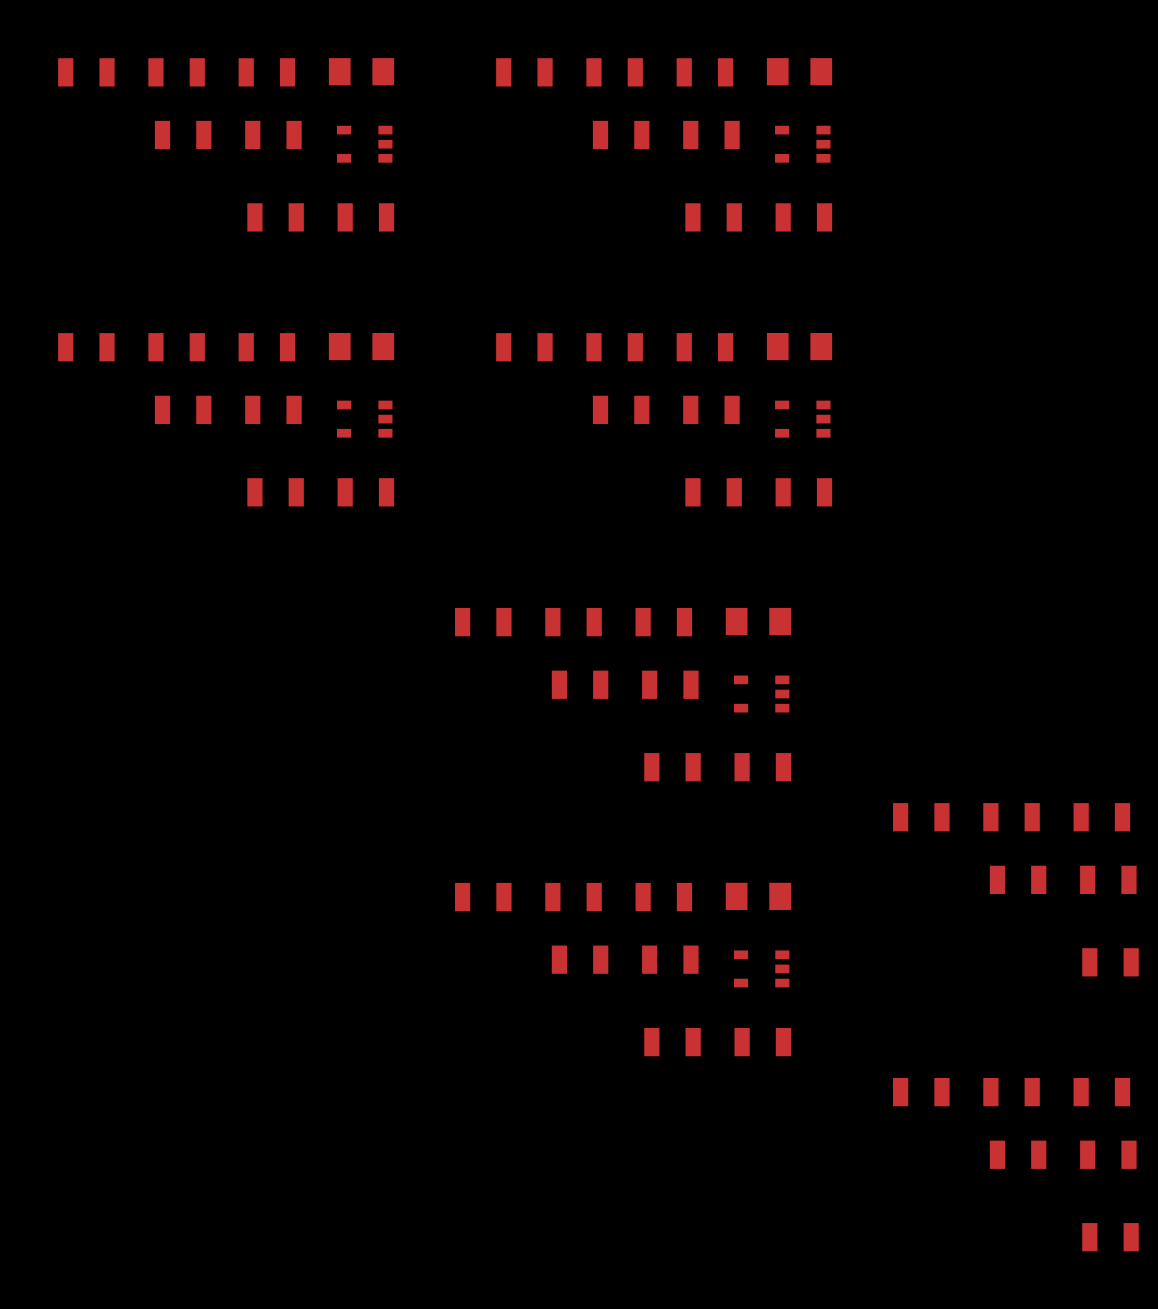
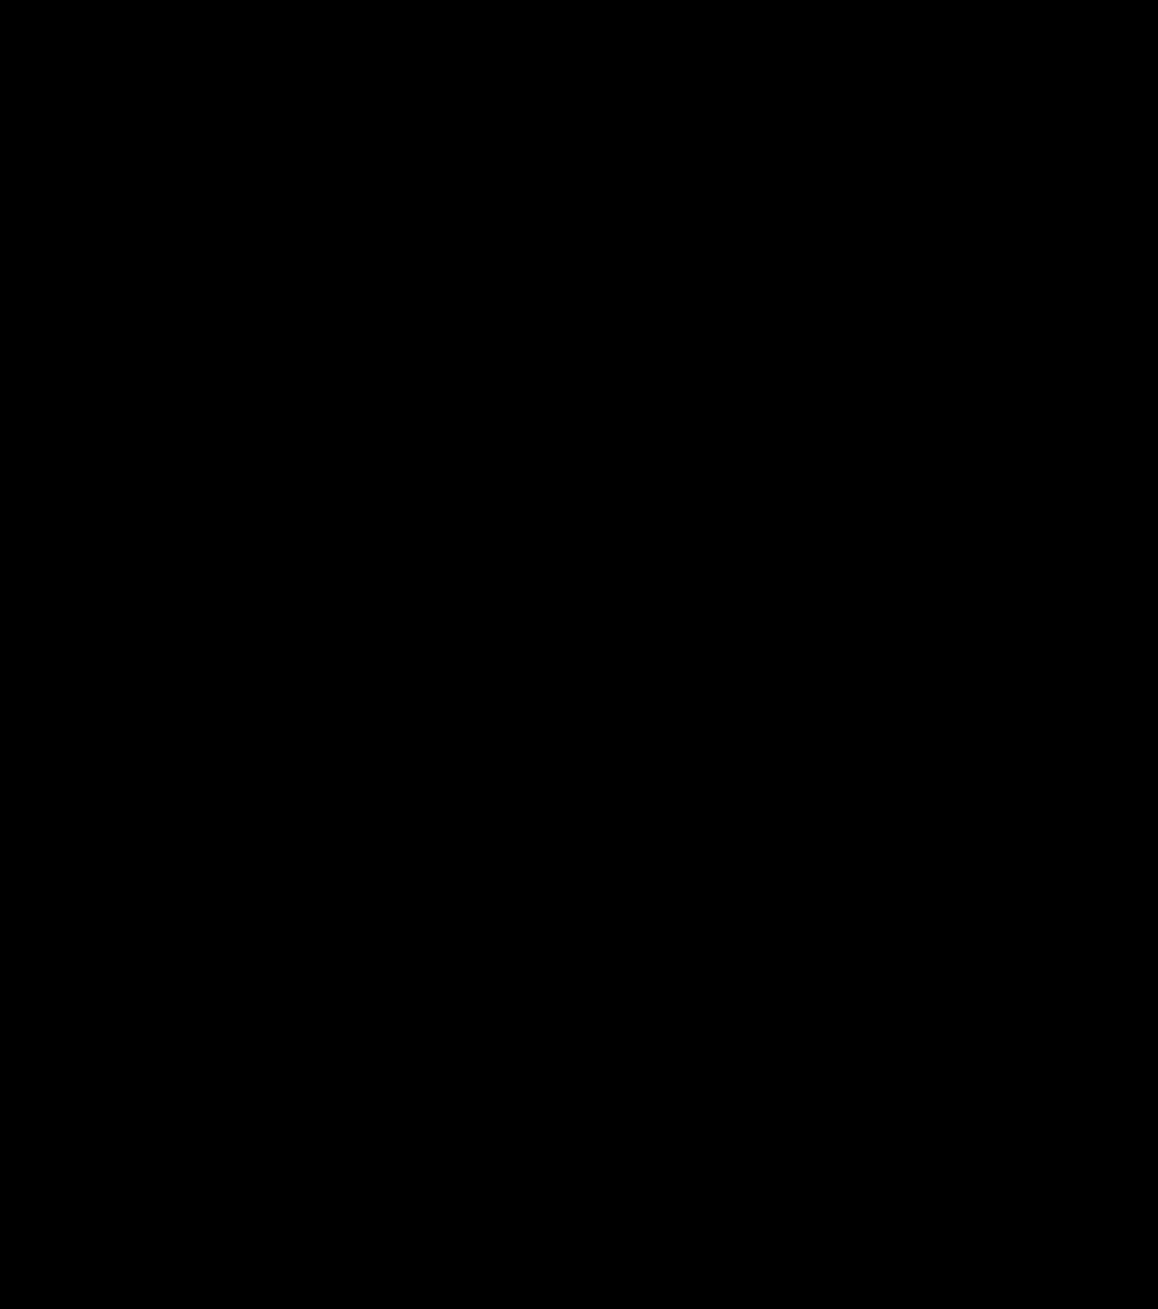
part: (361, 71) -> none
part: (799, 71) -> none
part: (86, 72) -> none
part: (176, 72) -> none
part: (266, 72) -> none
part: (524, 72) -> none
part: (614, 72) -> none
part: (704, 72) -> none
part: (183, 134) -> none
part: (273, 134) -> none
part: (621, 134) -> none
part: (711, 134) -> none
part: (364, 144) -> none
part: (802, 144) -> none
part: (275, 217) -> none
part: (365, 217) -> none
part: (713, 217) -> none
part: (803, 217) -> none
part: (361, 346) -> none
part: (799, 346) -> none
part: (86, 347) -> none
part: (176, 347) -> none
part: (266, 347) -> none
part: (524, 347) -> none
part: (614, 347) -> none
part: (704, 347) -> none
part: (183, 409) -> none
part: (273, 409) -> none
part: (621, 409) -> none
part: (711, 409) -> none
part: (364, 419) -> none
part: (802, 419) -> none
part: (275, 492) -> none
part: (365, 492) -> none
part: (713, 492) -> none
part: (803, 492) -> none
part: (758, 621) -> none
part: (483, 622) -> none
part: (573, 622) -> none
part: (663, 622) -> none
part: (580, 684) -> none
part: (670, 684) -> none
part: (761, 694) -> none
part: (672, 767) -> none
part: (762, 767) -> none
part: (921, 817) -> none
part: (1011, 817) -> none
part: (1101, 817) -> none
part: (1018, 879) -> none
part: (1108, 879) -> none
part: (758, 896) -> none
part: (483, 897) -> none
part: (573, 897) -> none
part: (663, 897) -> none
part: (580, 959) -> none
part: (670, 959) -> none
part: (1110, 962) -> none
part: (761, 968) -> none
part: (672, 1042) -> none
part: (762, 1042) -> none
part: (921, 1092) -> none
part: (1011, 1092) -> none
part: (1101, 1092) -> none
part: (1018, 1154) -> none
part: (1108, 1154) -> none
part: (1110, 1237) -> none

